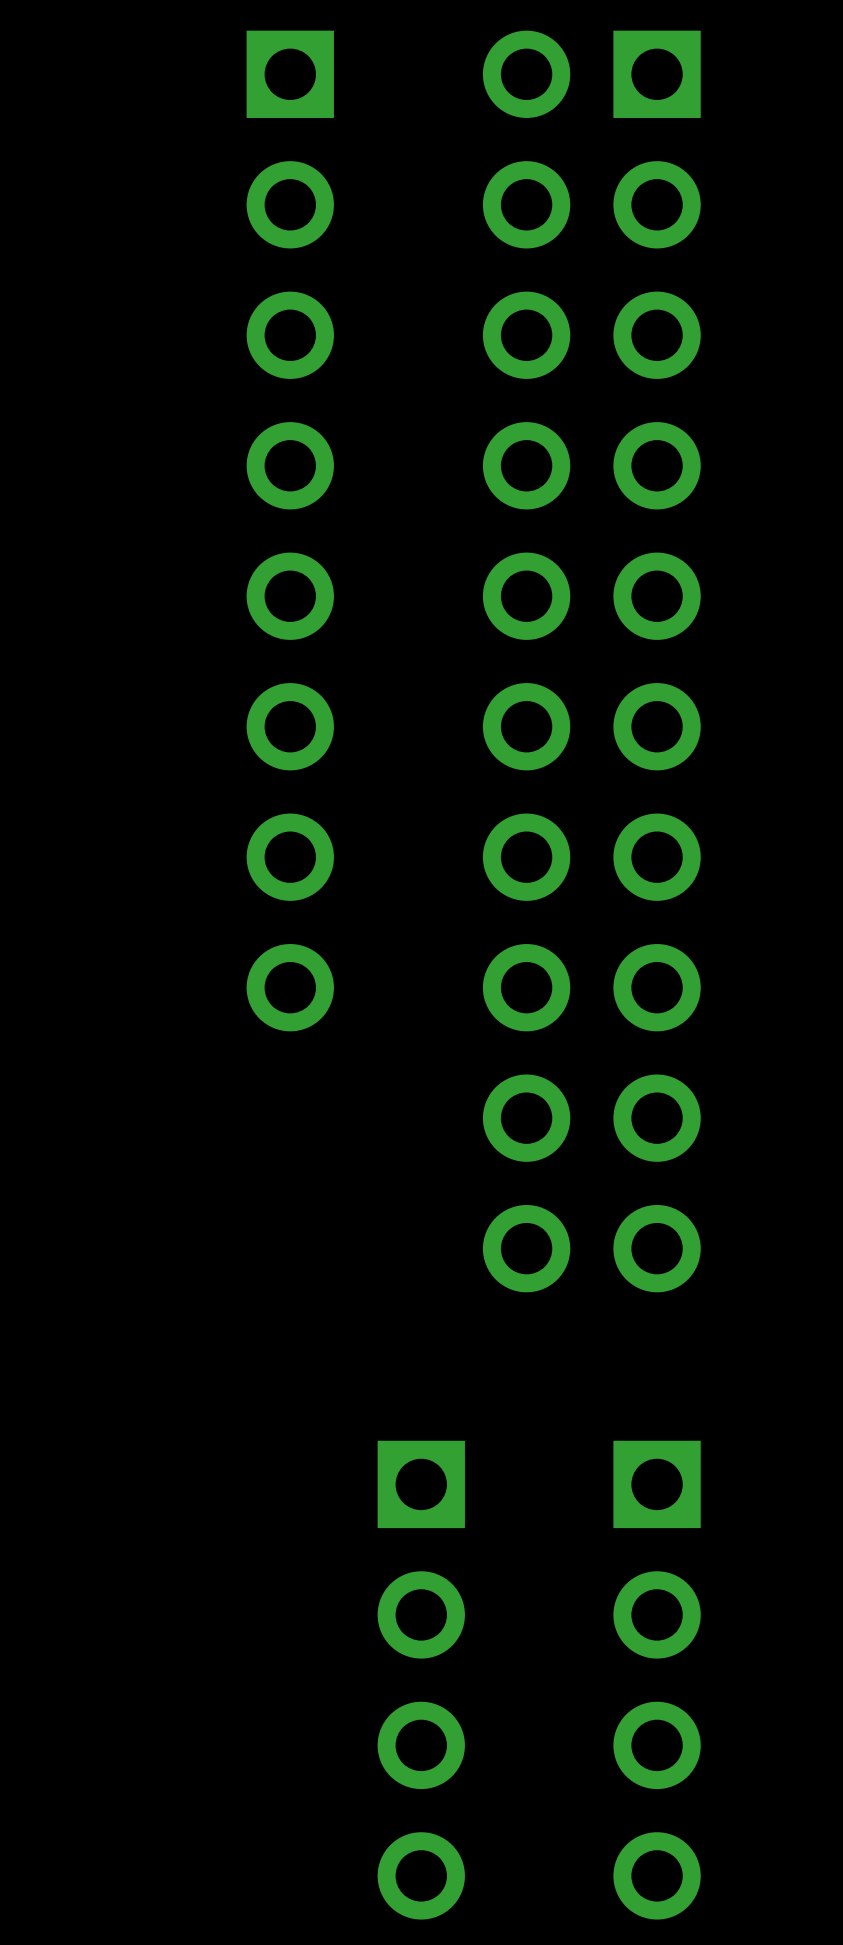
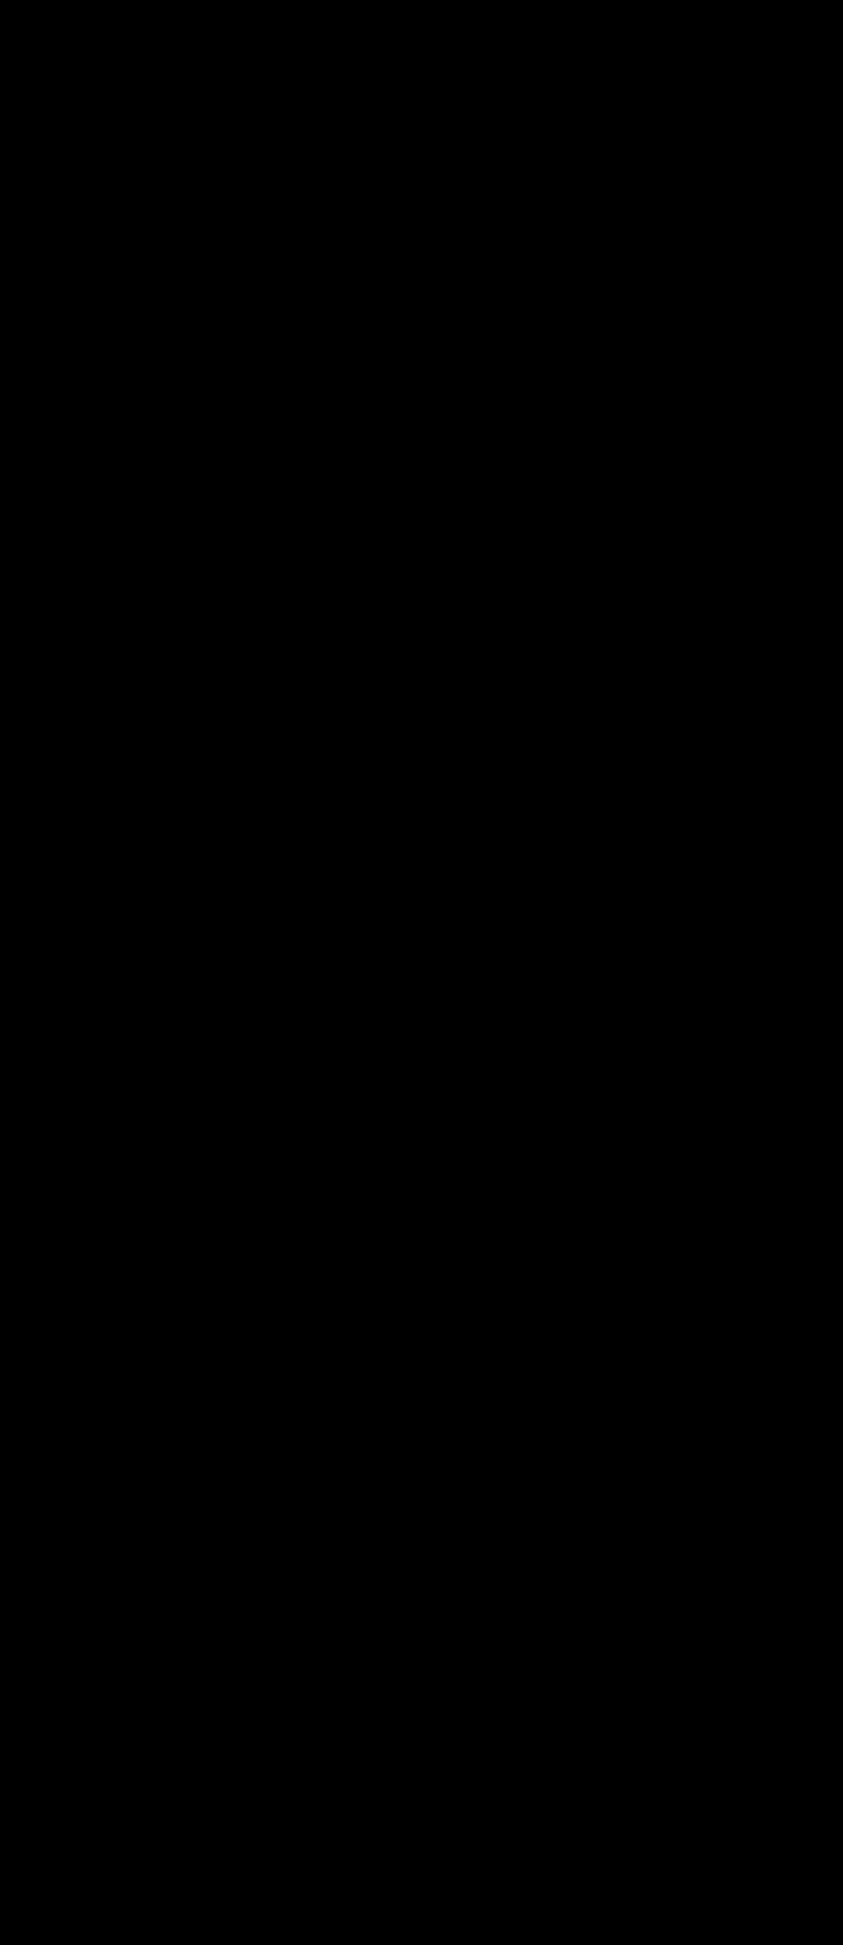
part: (290, 531) -> none
part: (591, 661) -> none
part: (421, 1680) -> none
part: (657, 1680) -> none

